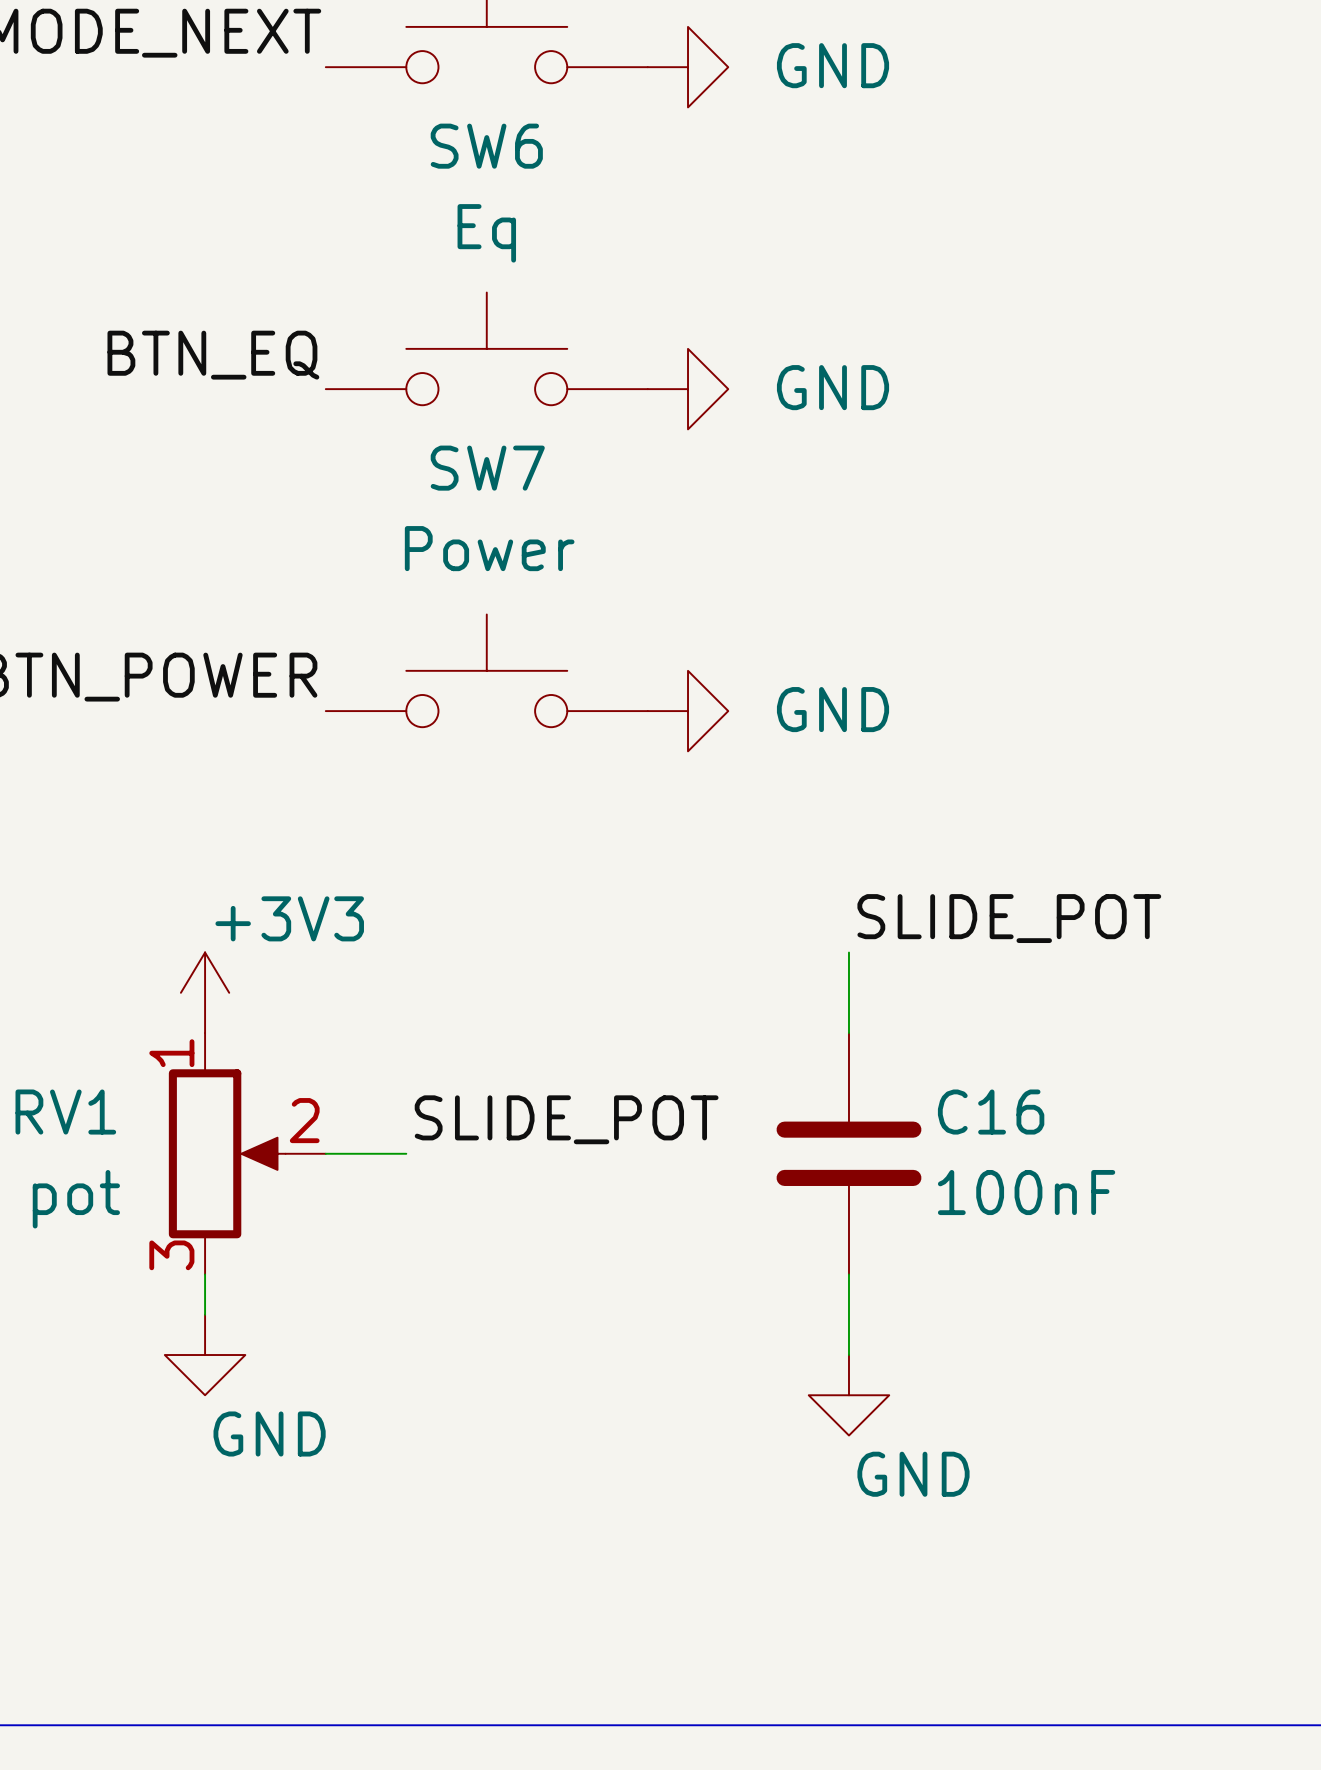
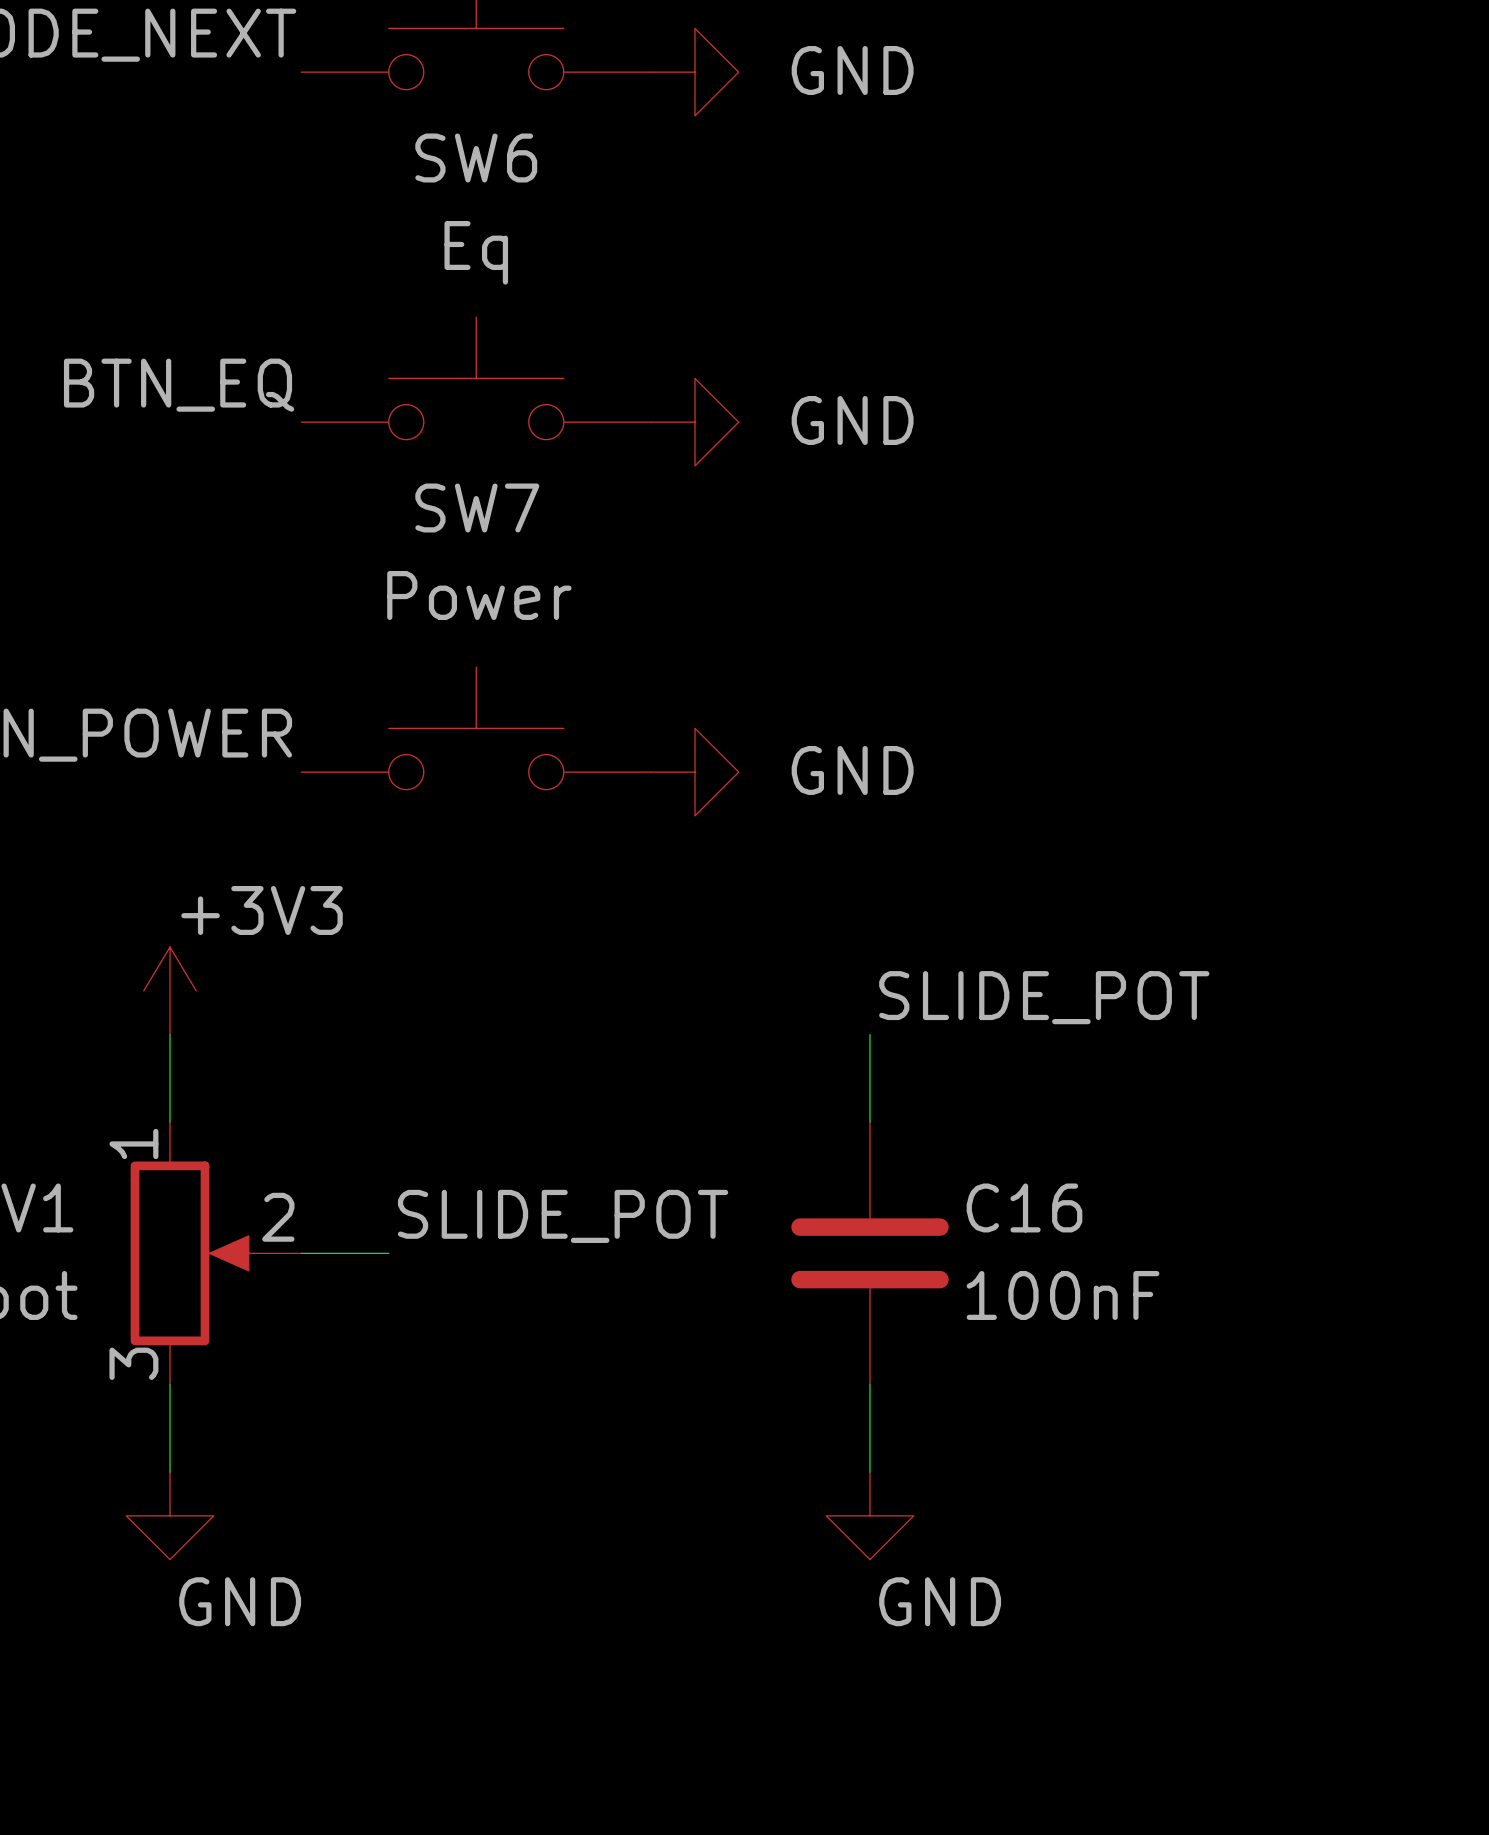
power symbol position: +3V3 (205, 992) -> +3V3 (170, 990)
power symbol position: GND (205, 1355) -> GND (170, 1515)

